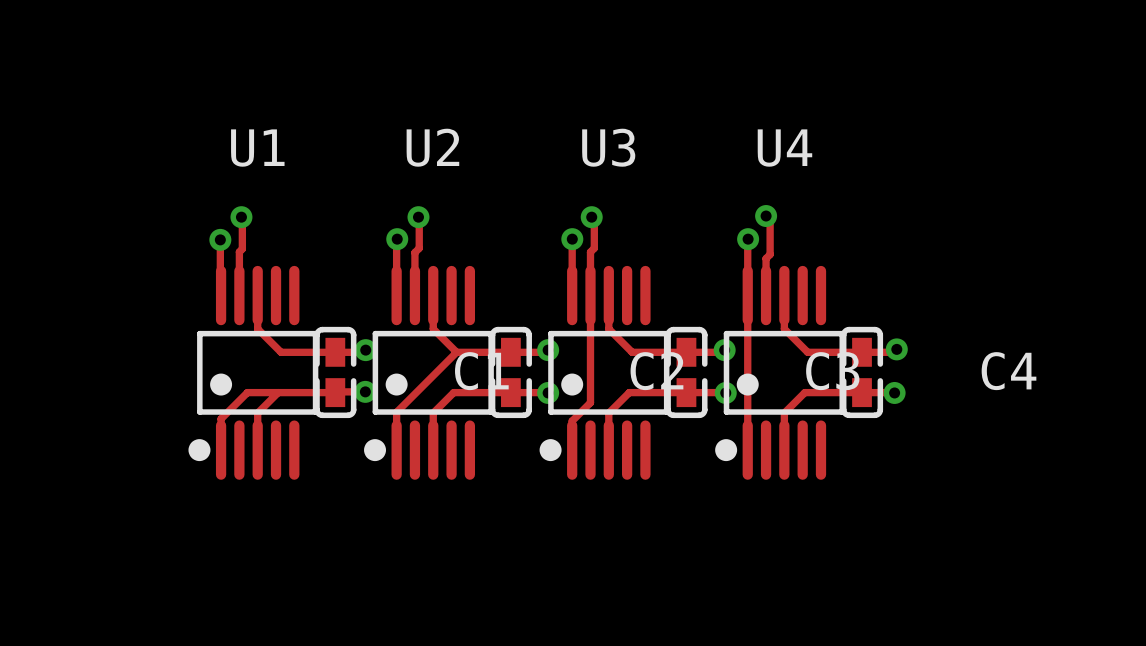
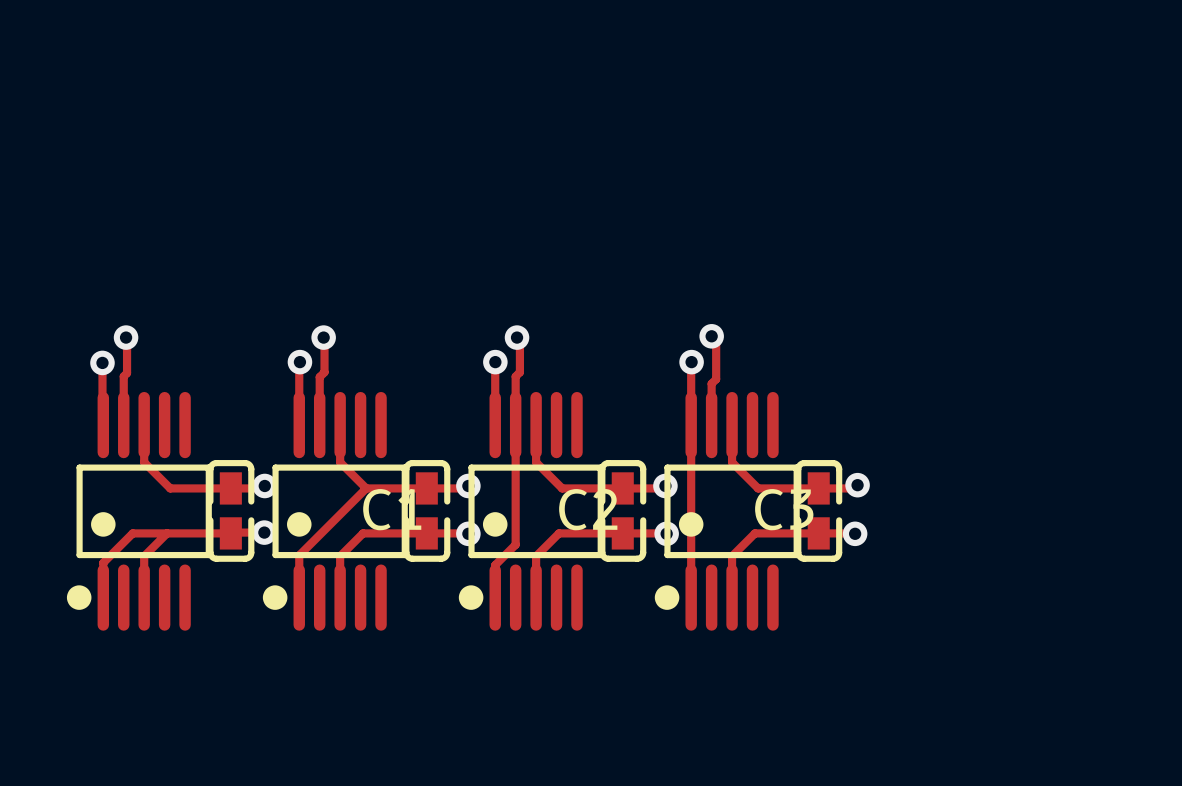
U2 name: U2 (432, 147) -> none
U3 name: U3 (608, 147) -> none
U1 name: U1 (257, 148) -> none
U4 name: U4 (784, 148) -> none
C4 name: C4 (1009, 371) -> none

